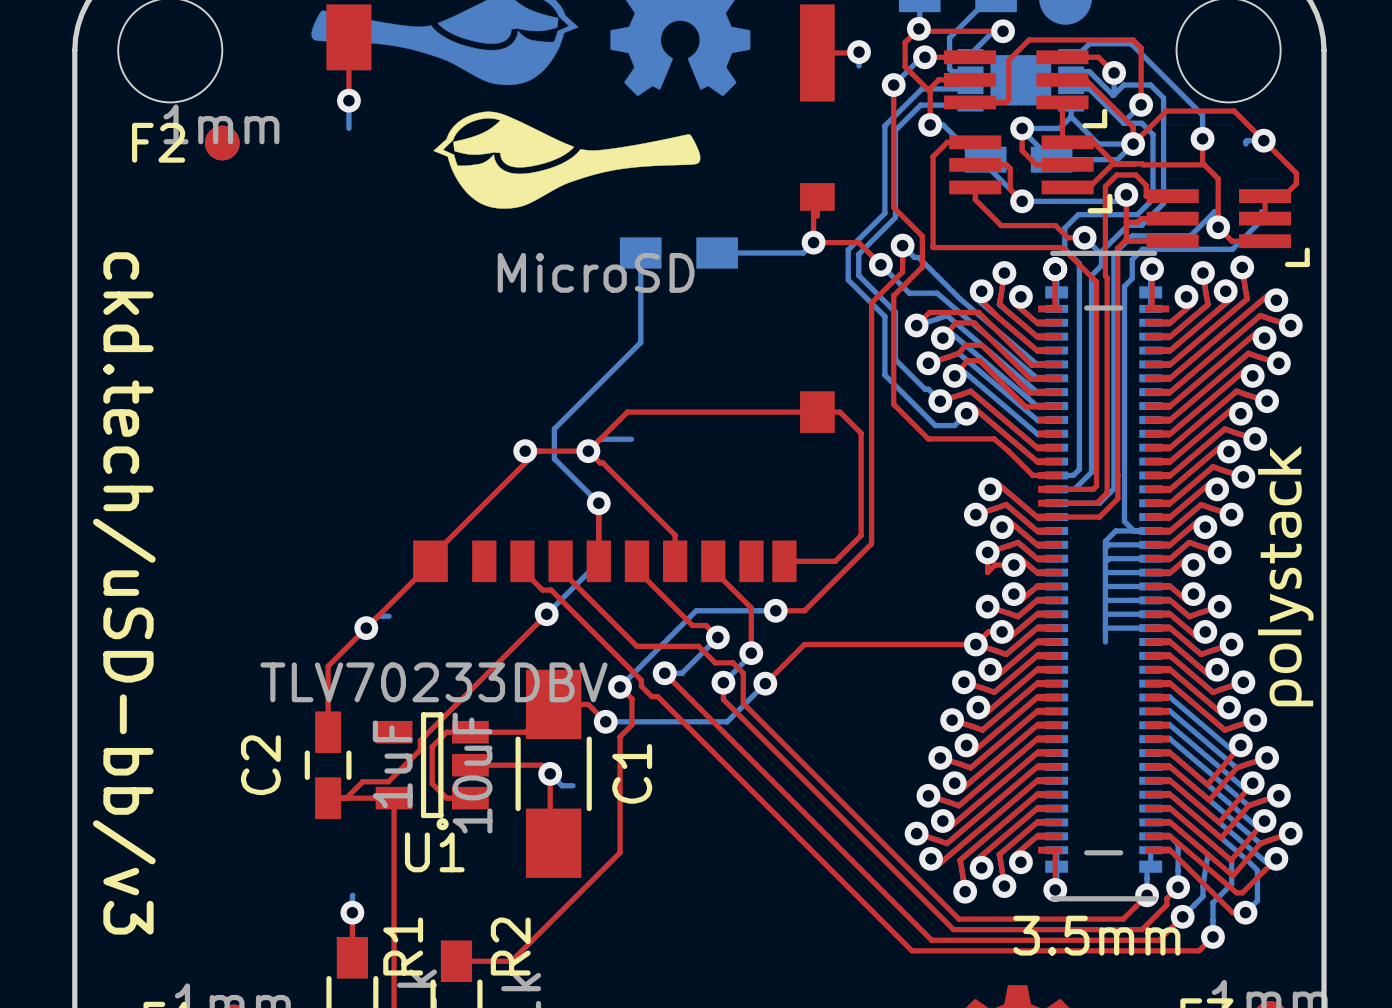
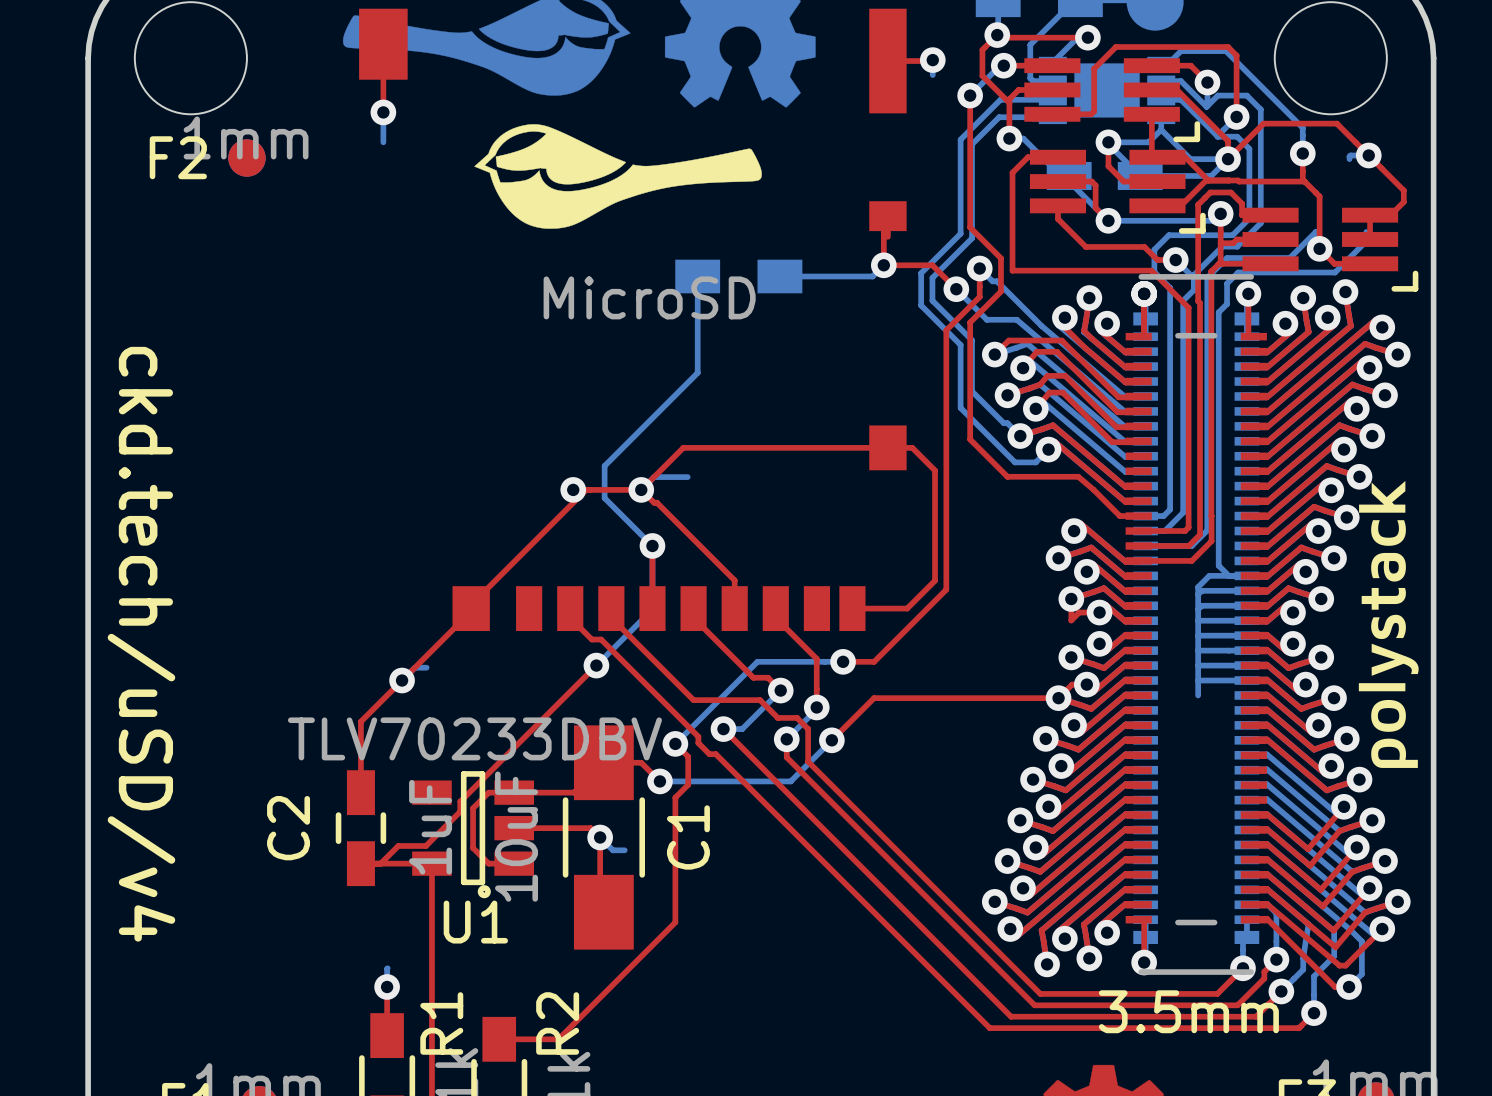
drawing shape: [1258, 445, 1314, 707] -> [1358, 480, 1419, 768]
text: ckd.tech/uSD-bb/v3 (124, 593) -> ckd.tech/uSD/v4 (141, 644)

